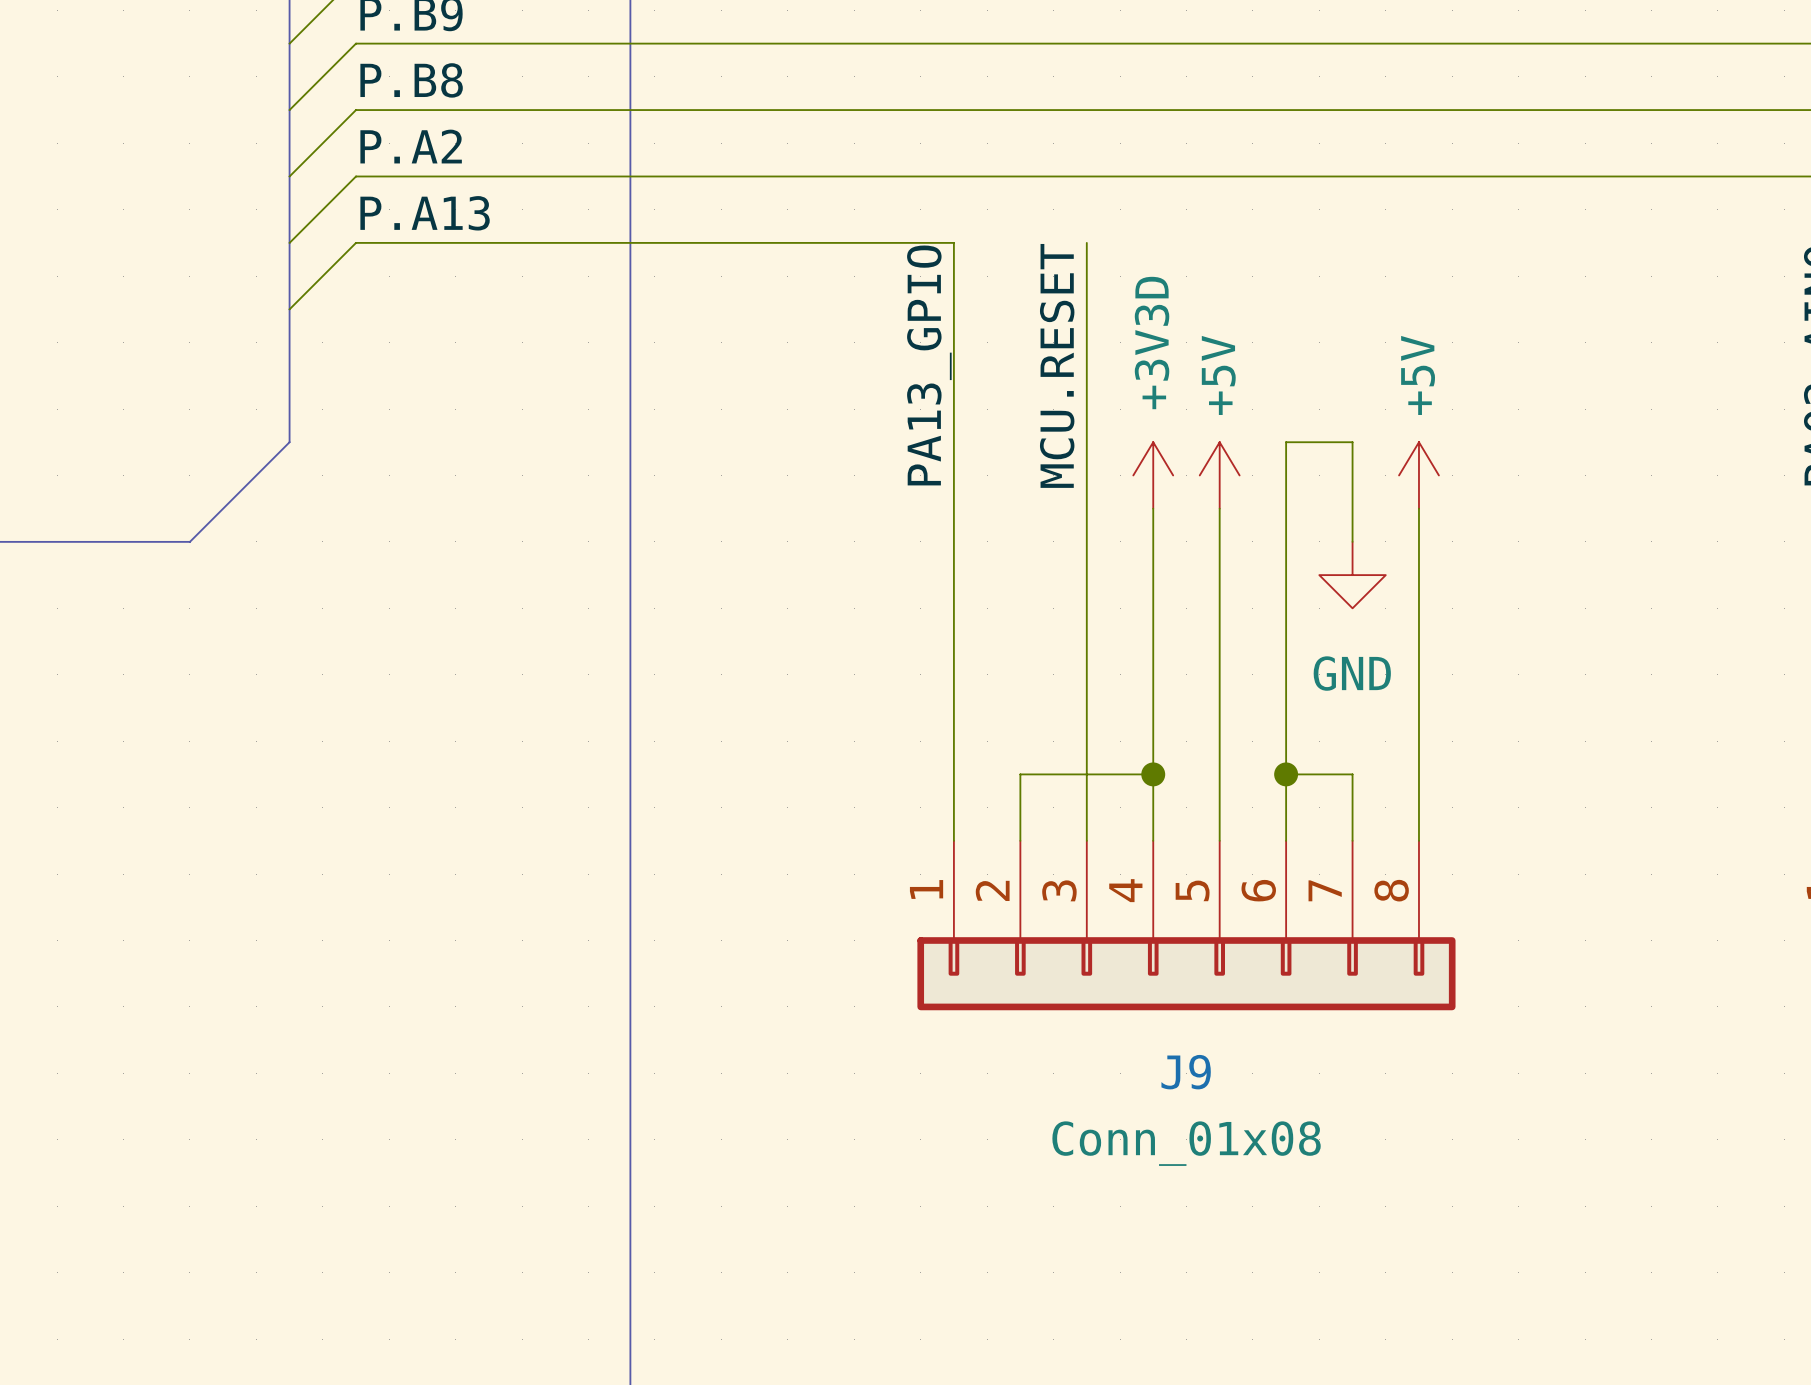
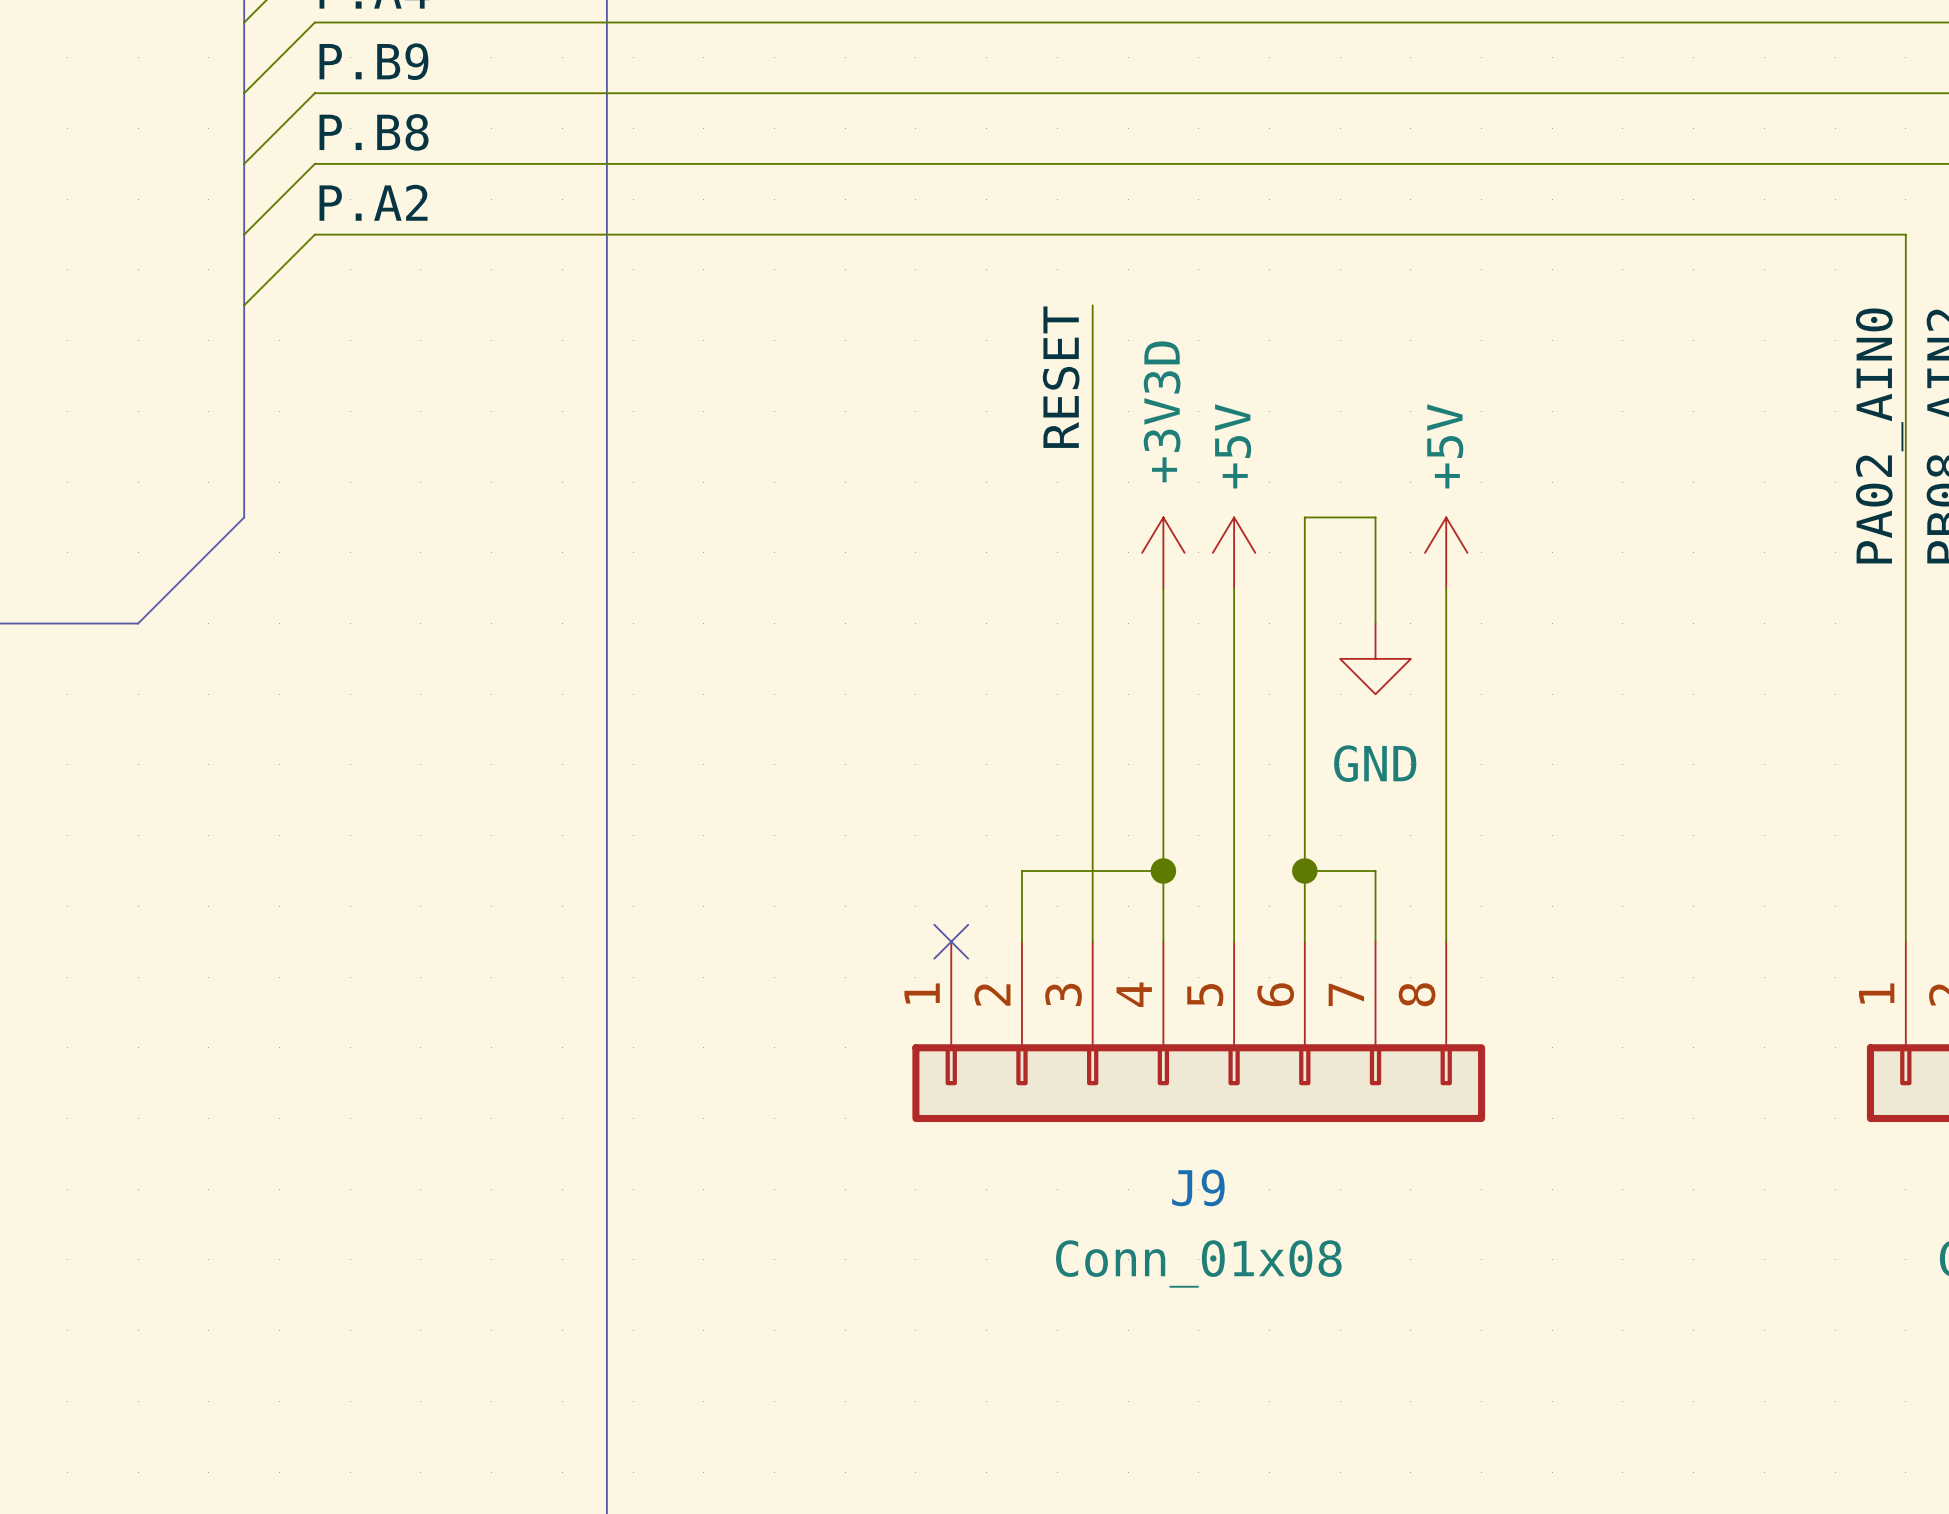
label: P.A13 (425, 213) -> none
wire: (289, 309) (356, 242) (953, 242) (953, 840) -> none
label: PA13_GPIO (929, 365) -> none
label: MCU.RESET (1057, 365) -> RESET (1061, 377)
no-connect mark: none -> (951, 941)

